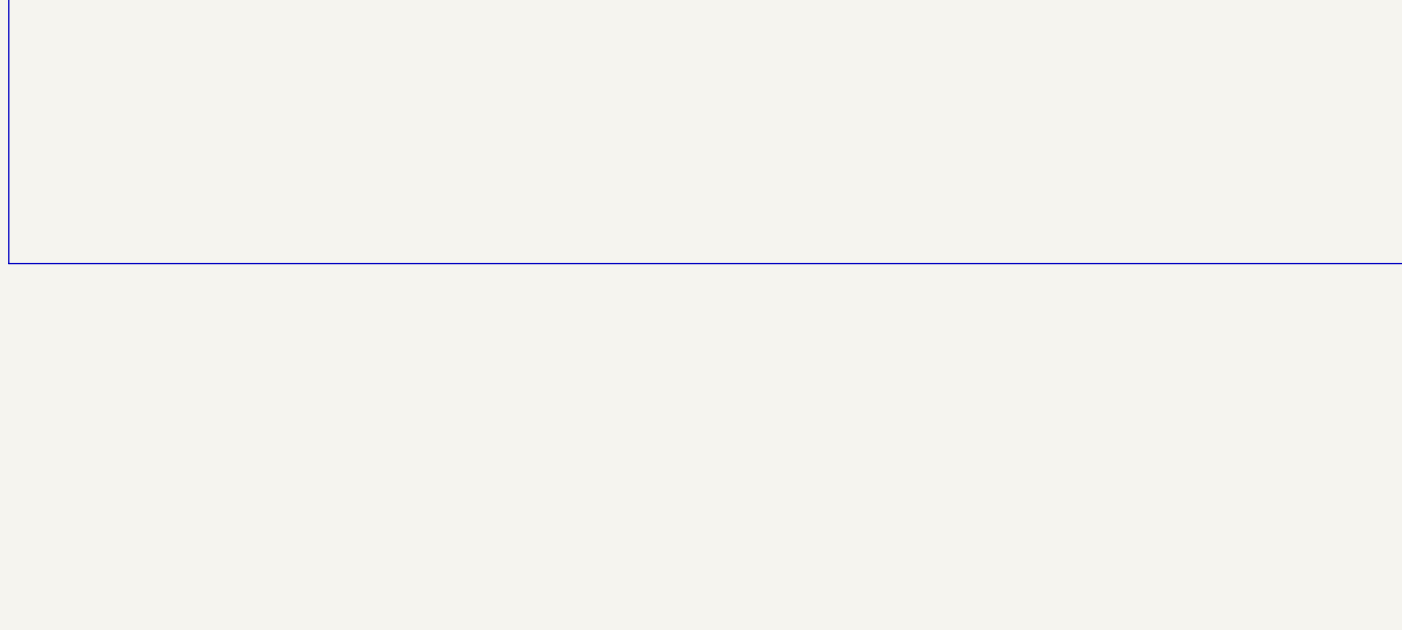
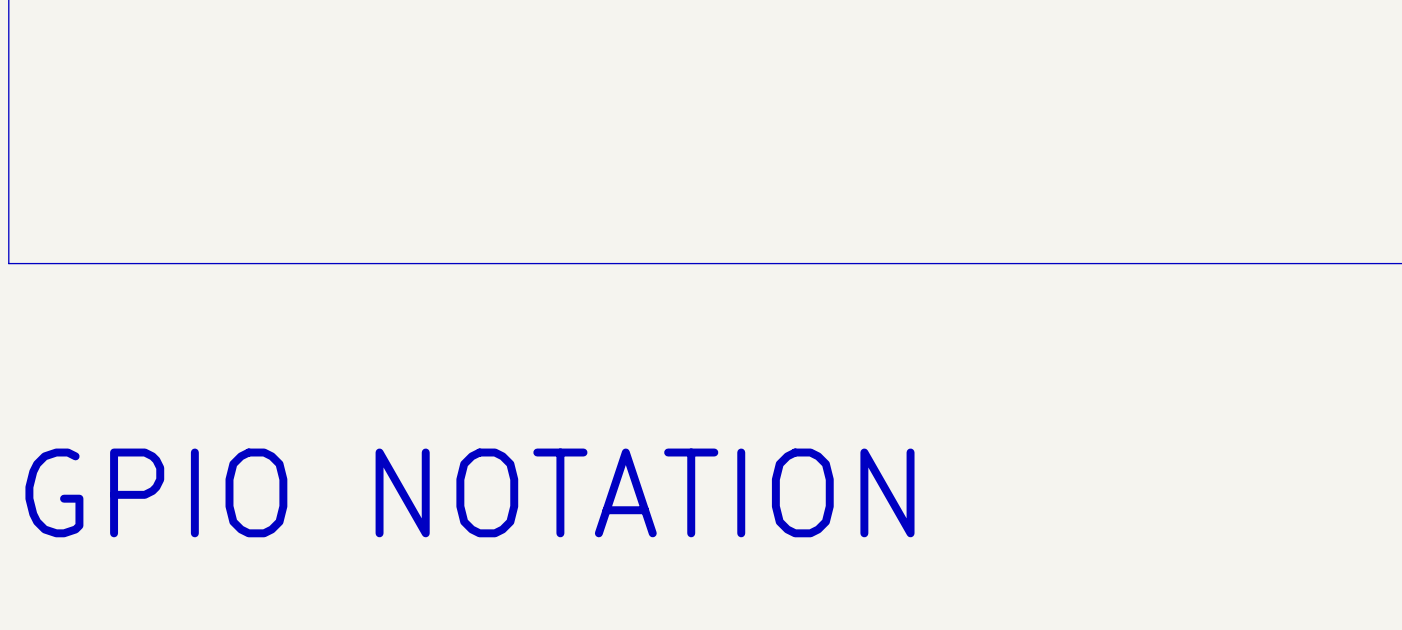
text: none -> GPIO NOTATION (469, 492)

